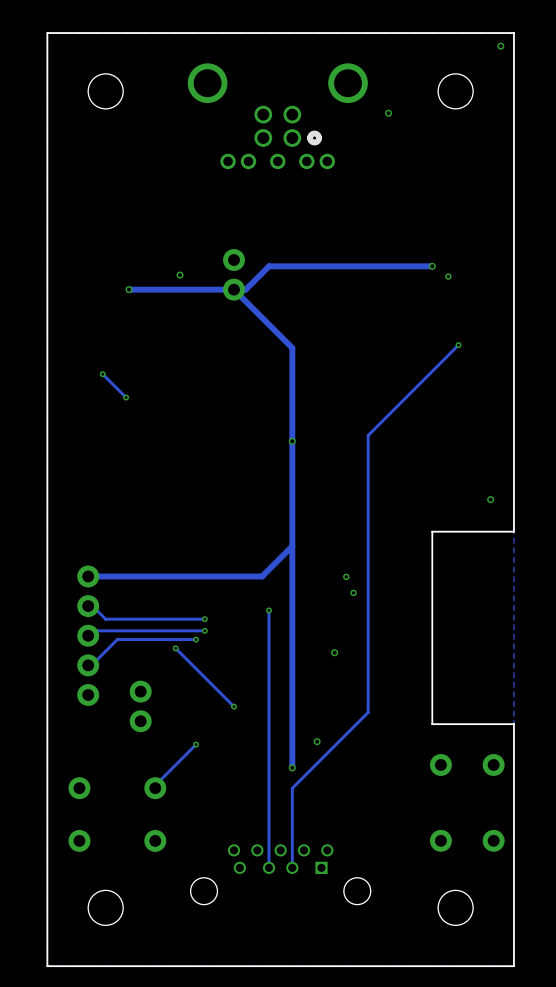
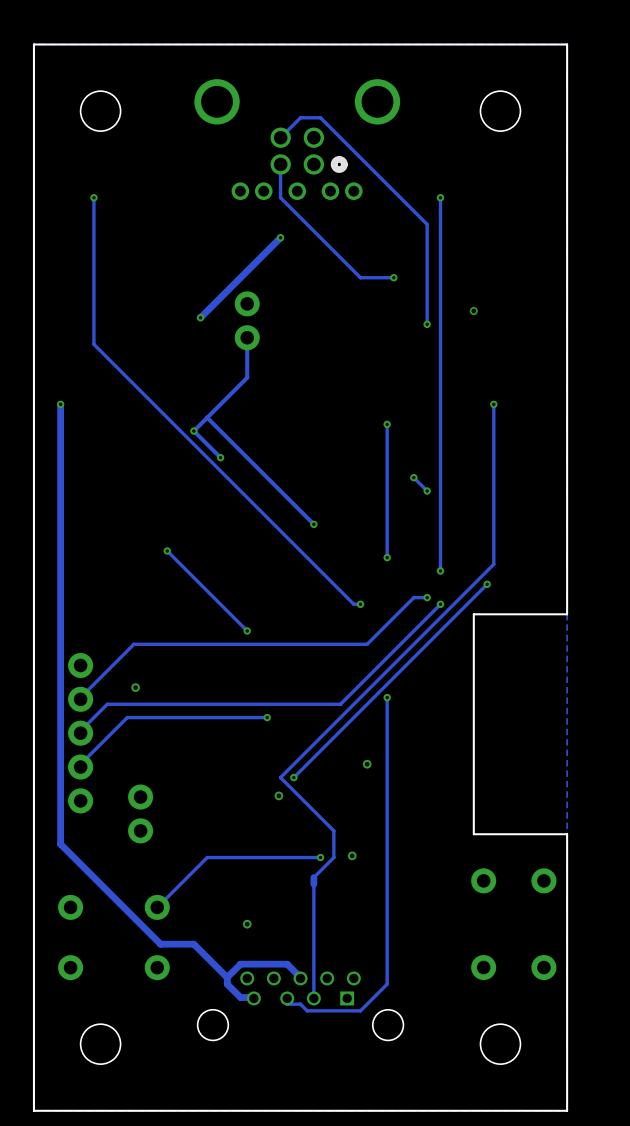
via: (500, 46) -> none
via: (388, 113) -> none
track: none -> (280, 137) (300, 117) (320, 117) (427, 224) (427, 324)
track: none -> (280, 164) (280, 197) (360, 277) (393, 277)
track: none -> (93, 197) (93, 344) (353, 604) (360, 604)
via: none -> (93, 197)
track: none -> (440, 197) (440, 570)
via: none -> (440, 197)
track: none -> (280, 237) (200, 317)
via: none -> (280, 237)
via: none -> (393, 277)
track: (432, 266) (269, 266) (245, 289) (129, 289) -> none
via: none -> (200, 317)
via: (180, 275) -> none
via: (448, 276) -> none
via: none -> (427, 324)
via: (129, 289) -> none
track: (234, 289) (292, 347) (292, 762) -> (493, 404) (493, 564) (280, 777) (333, 830) (333, 857) (313, 877)
track: none -> (247, 337) (247, 377) (193, 431) (220, 457)
track: (458, 345) (368, 435) (368, 712) (292, 788) -> (313, 884) (313, 907)
via: (458, 345) -> none
track: none -> (60, 404) (60, 844) (160, 944) (193, 944) (227, 977)
via: none -> (60, 404)
via: none -> (493, 404)
track: none -> (207, 417) (313, 524)
track: none -> (387, 424) (387, 557)
via: none -> (387, 424)
via: none -> (193, 431)
track: (102, 374) (126, 397) -> none
via: (102, 374) -> none
via: none -> (220, 457)
via: (126, 397) -> none
track: none -> (413, 477) (427, 491)
via: none -> (413, 477)
via: none -> (427, 491)
via: (292, 441) -> none
via: none -> (313, 524)
track: none -> (167, 550) (247, 630)
via: none -> (167, 550)
via: none -> (387, 557)
via: none -> (440, 570)
via: (490, 499) -> none
track: none -> (487, 584) (293, 777)
via: none -> (487, 584)
via: none -> (427, 597)
via: none -> (360, 604)
via: none -> (440, 604)
via: none -> (247, 630)
track: (292, 546) (262, 576) (88, 576) -> none
via: (346, 576) -> none
via: (353, 592) -> none
via: none -> (135, 687)
via: none -> (387, 697)
track: (88, 606) (94, 607) (105, 619) (204, 619) -> (80, 699) (133, 644) (367, 644) (413, 597) (427, 597)
track: (269, 610) (269, 867) -> (387, 697) (387, 984) (360, 1010) (307, 1010) (300, 1004) (287, 1004) (287, 998)
via: (269, 610) -> none
via: (204, 619) -> none
via: none -> (267, 717)
track: (204, 630) (91, 630) -> (440, 604) (340, 704) (107, 704) (83, 727)
via: (204, 630) -> none
track: (196, 639) (117, 639) (94, 662) (88, 662) -> (267, 717) (127, 717) (80, 764)
via: (196, 639) -> none
track: (175, 648) (234, 706) -> none
via: (175, 648) -> none
via: (334, 652) -> none
via: none -> (367, 764)
via: none -> (293, 777)
via: none -> (278, 795)
via: (234, 706) -> none
via: (317, 741) -> none
via: none -> (352, 855)
track: (196, 744) (155, 785) (155, 788) -> (320, 857) (207, 857) (157, 907)
via: (196, 744) -> none
via: none -> (320, 857)
via: (292, 767) -> none
via: none -> (247, 924)
track: none -> (227, 977) (240, 964) (287, 964) (300, 978)
track: none -> (227, 977) (227, 984) (240, 997) (253, 998)

